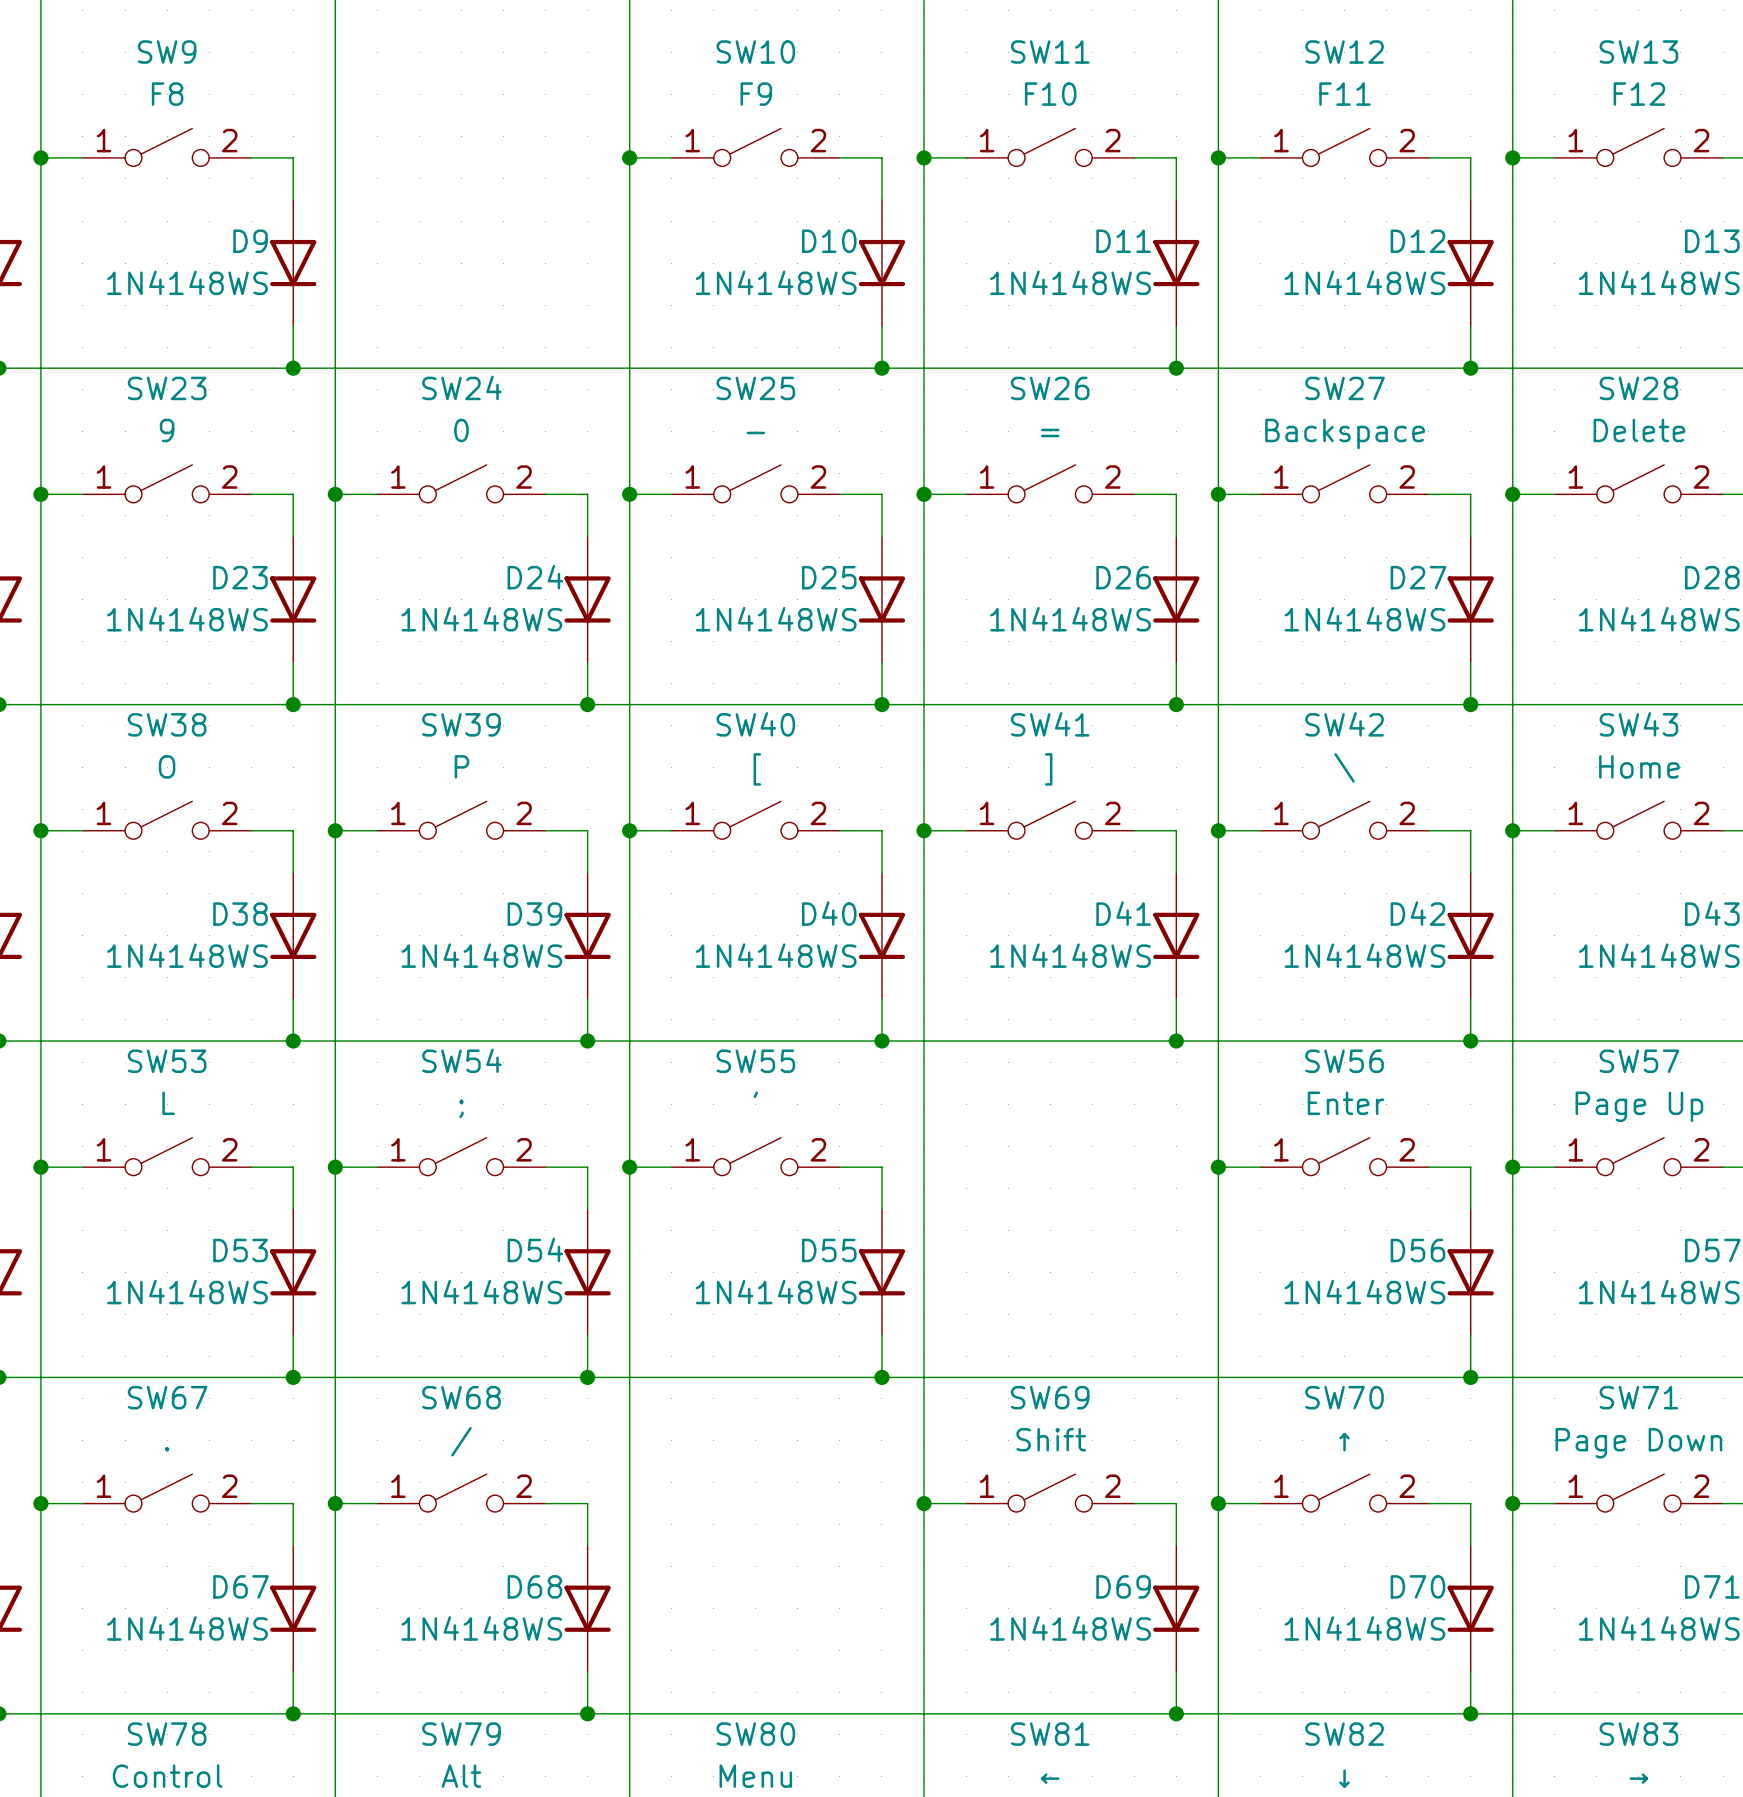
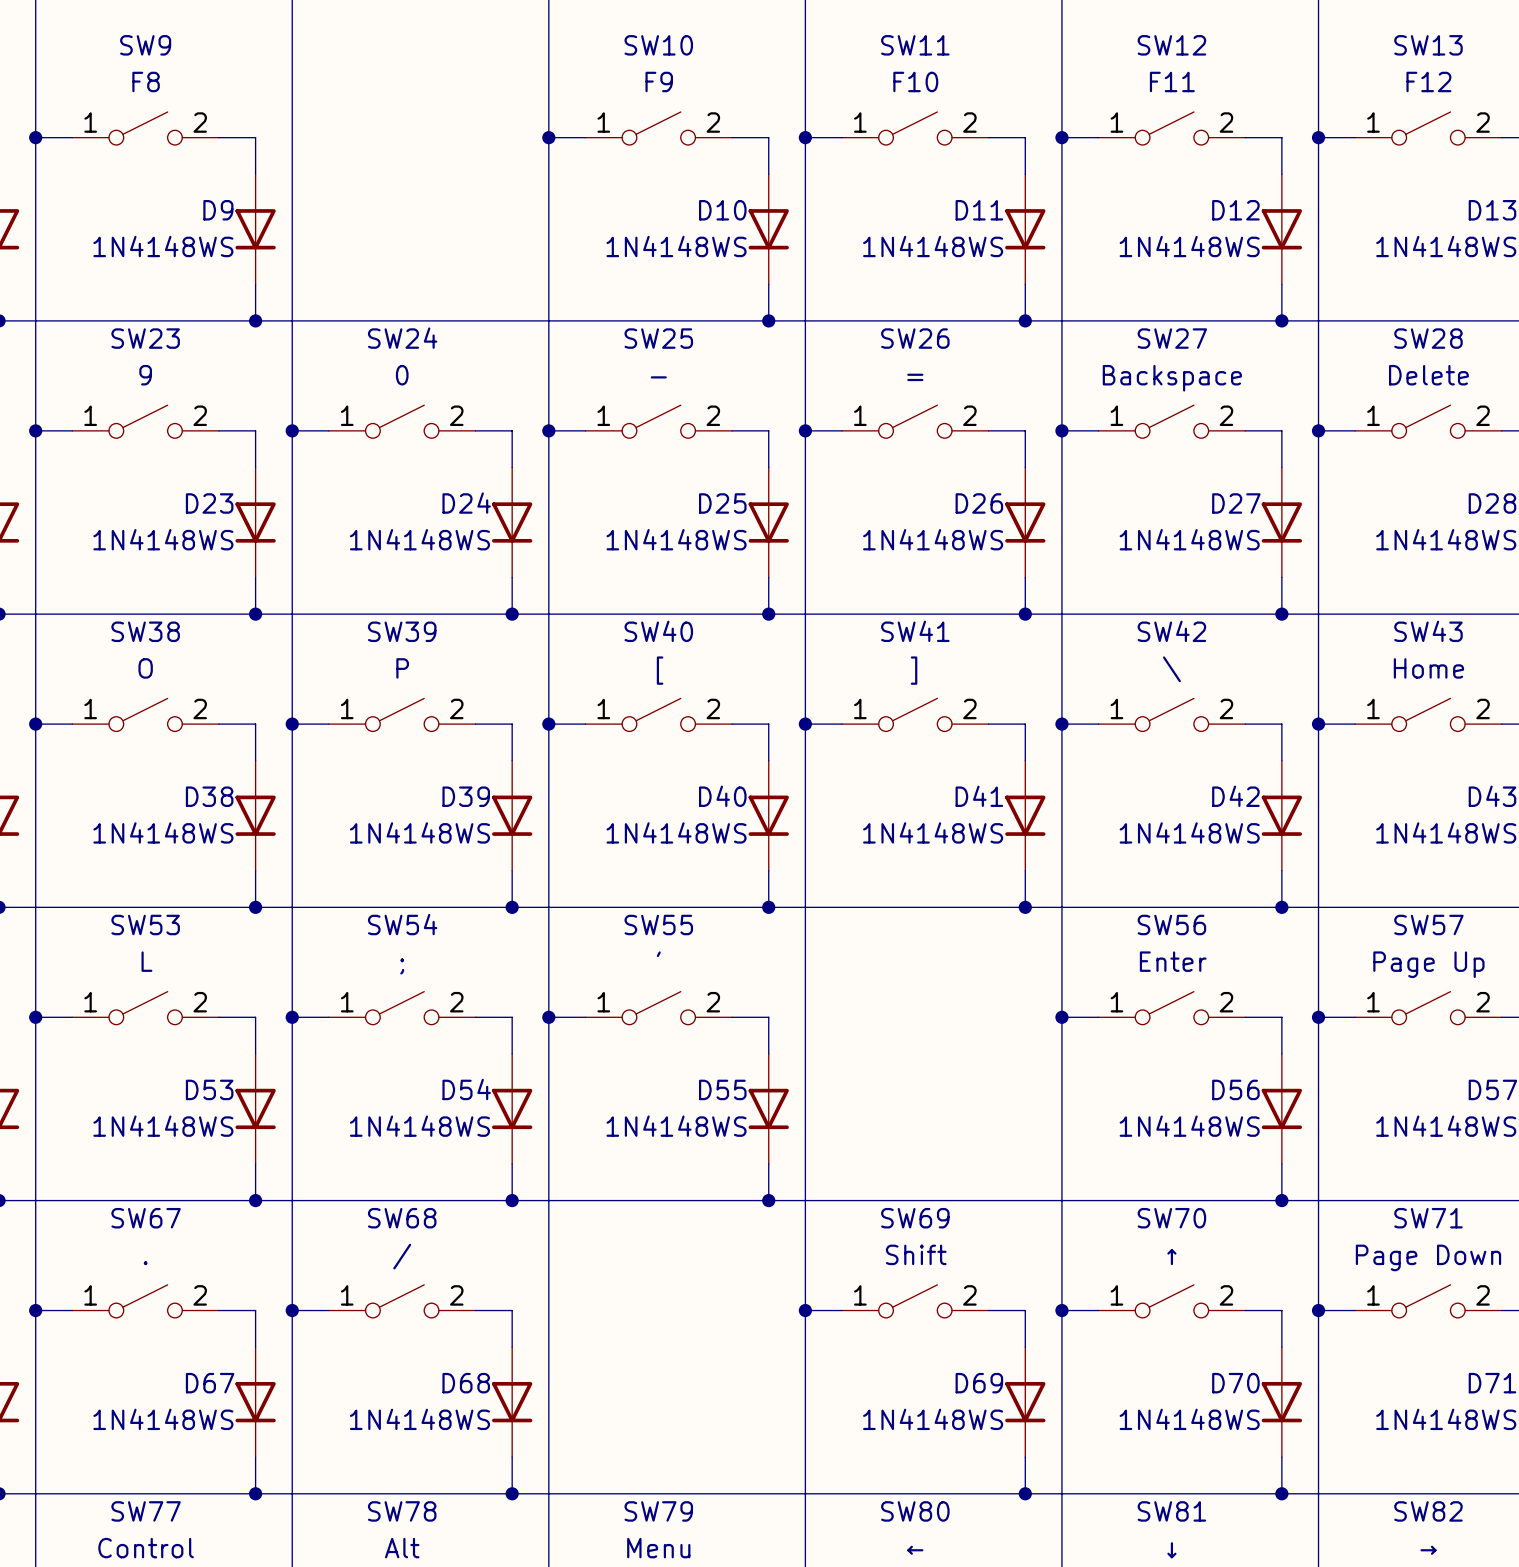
SW78 name: SW78 (167, 1734) -> SW77 (146, 1511)
SW79 name: SW79 (461, 1734) -> SW78 (402, 1511)
SW80 name: SW80 (755, 1734) -> SW79 (658, 1511)
SW81 name: SW81 (1050, 1734) -> SW80 (915, 1511)
SW82 name: SW82 (1344, 1734) -> SW81 (1171, 1511)
SW83 name: SW83 (1638, 1734) -> SW82 (1428, 1511)

